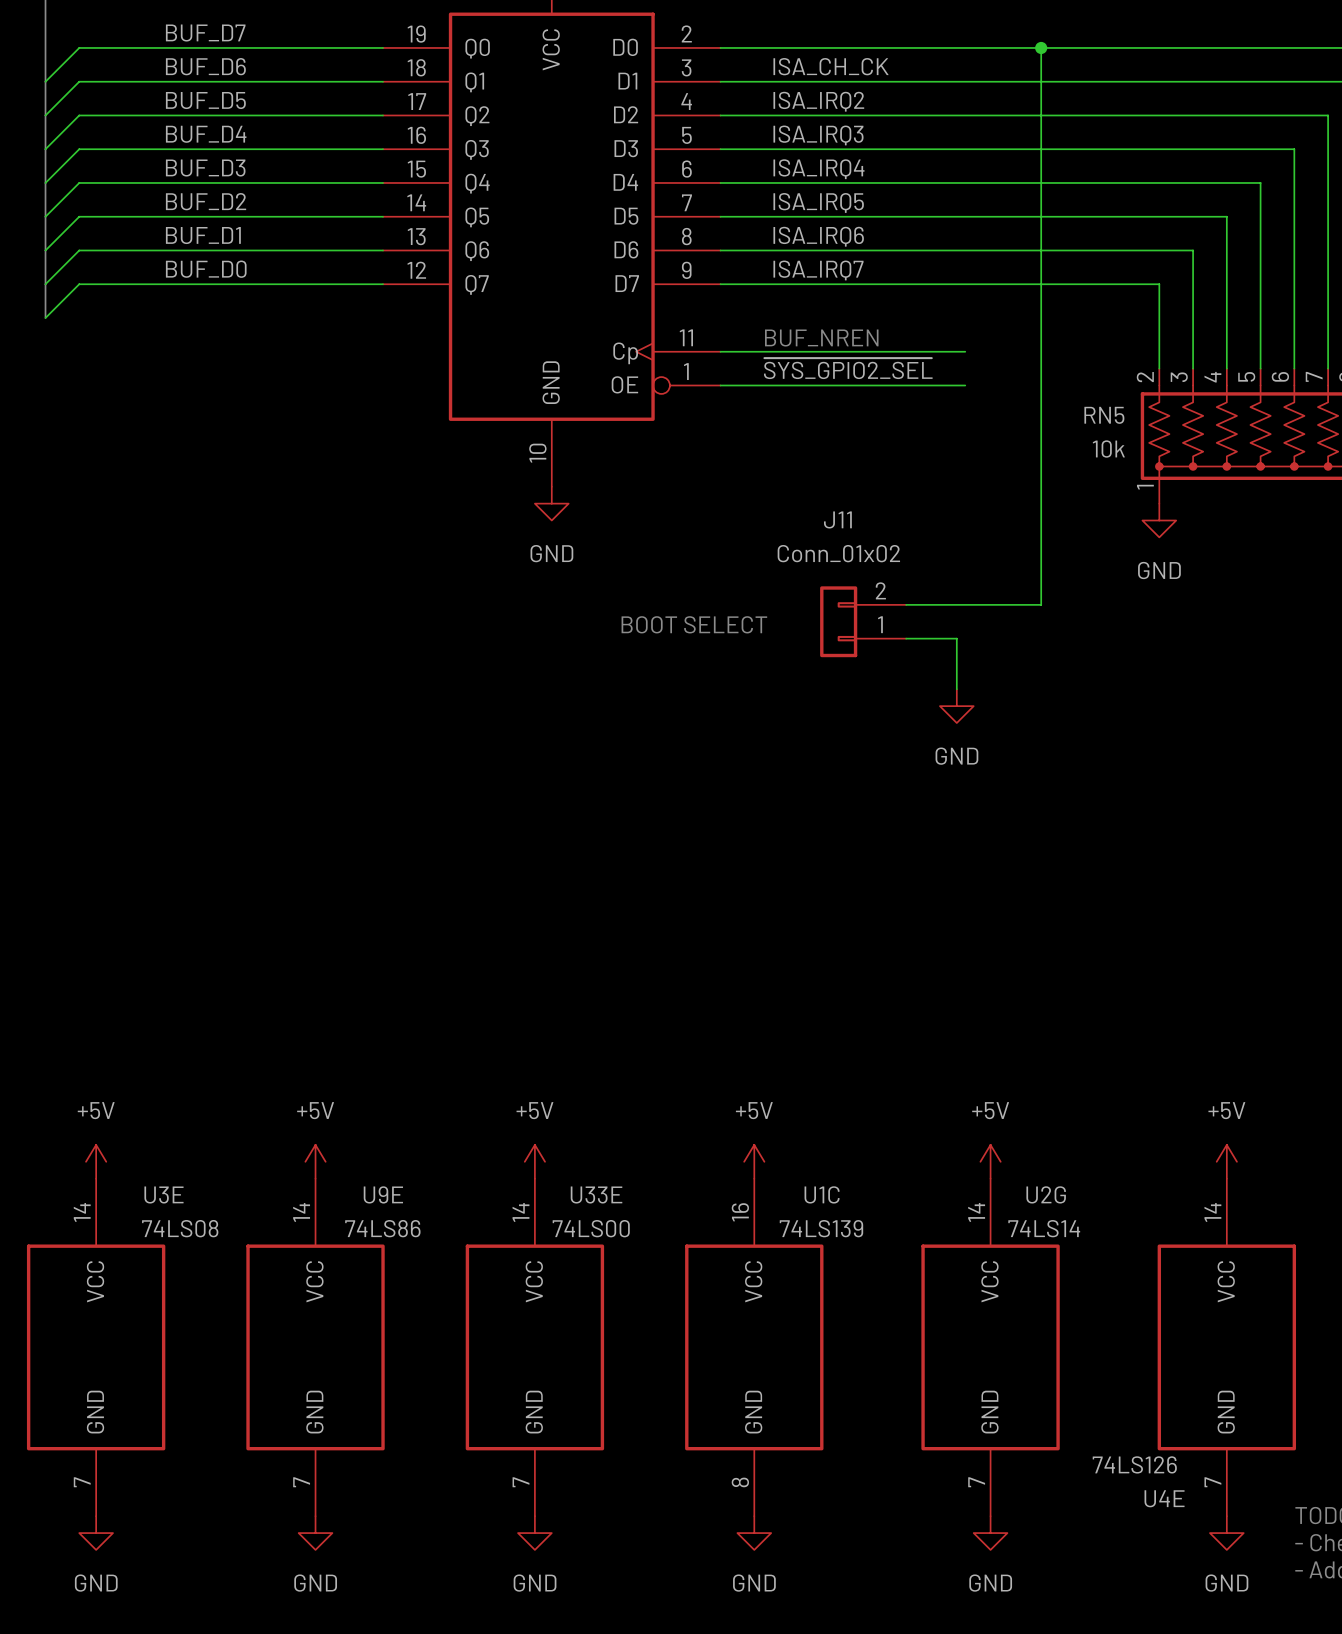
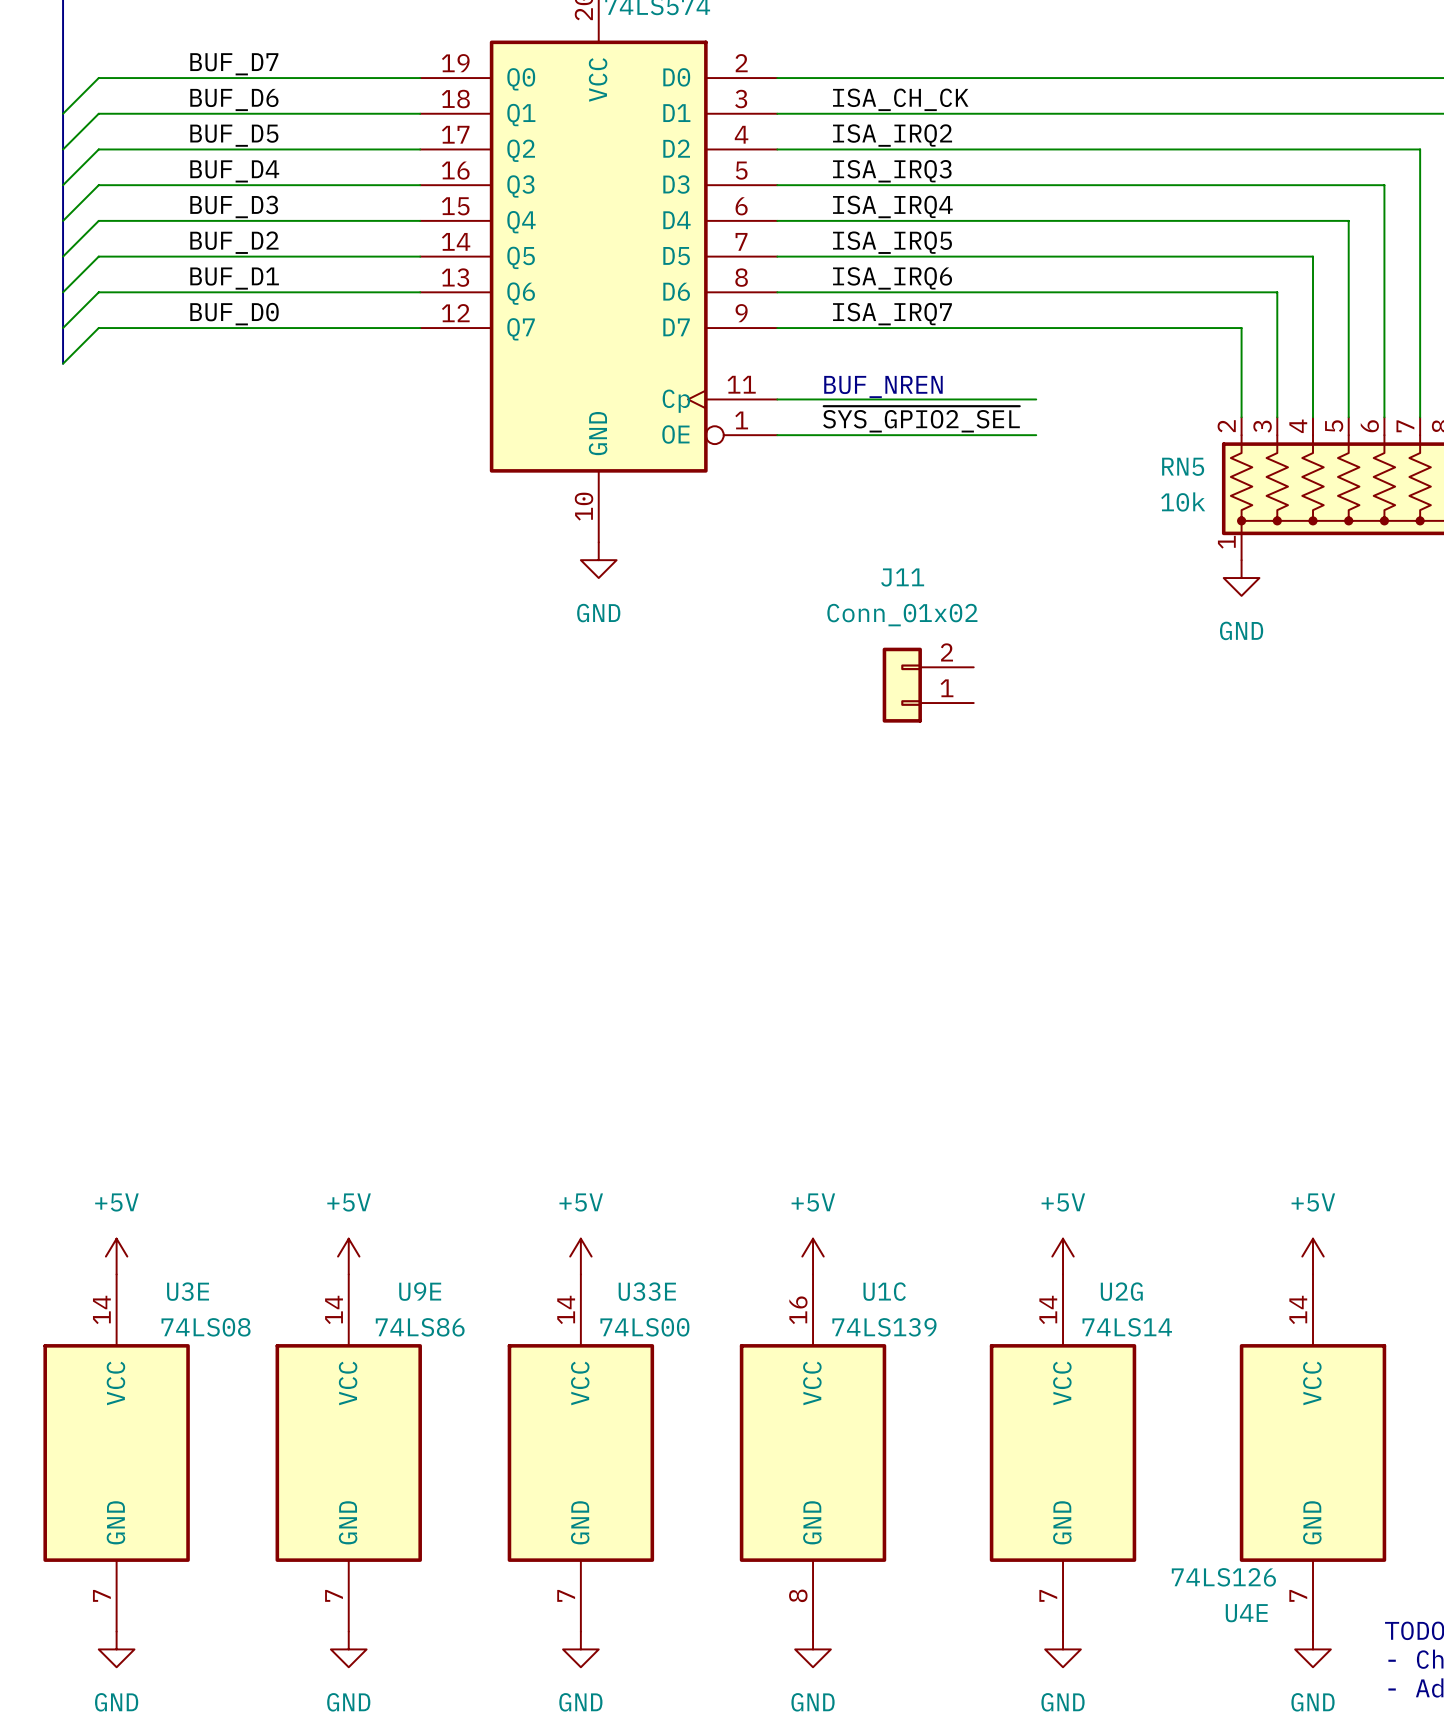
wire: (1041, 47) (1041, 604) (906, 604) -> none
junction: (1041, 47) -> none
text: BOOT SELECT (694, 624) -> none
wire: (906, 638) (956, 638) (956, 689) -> none
power symbol: GND (956, 706) -> none

